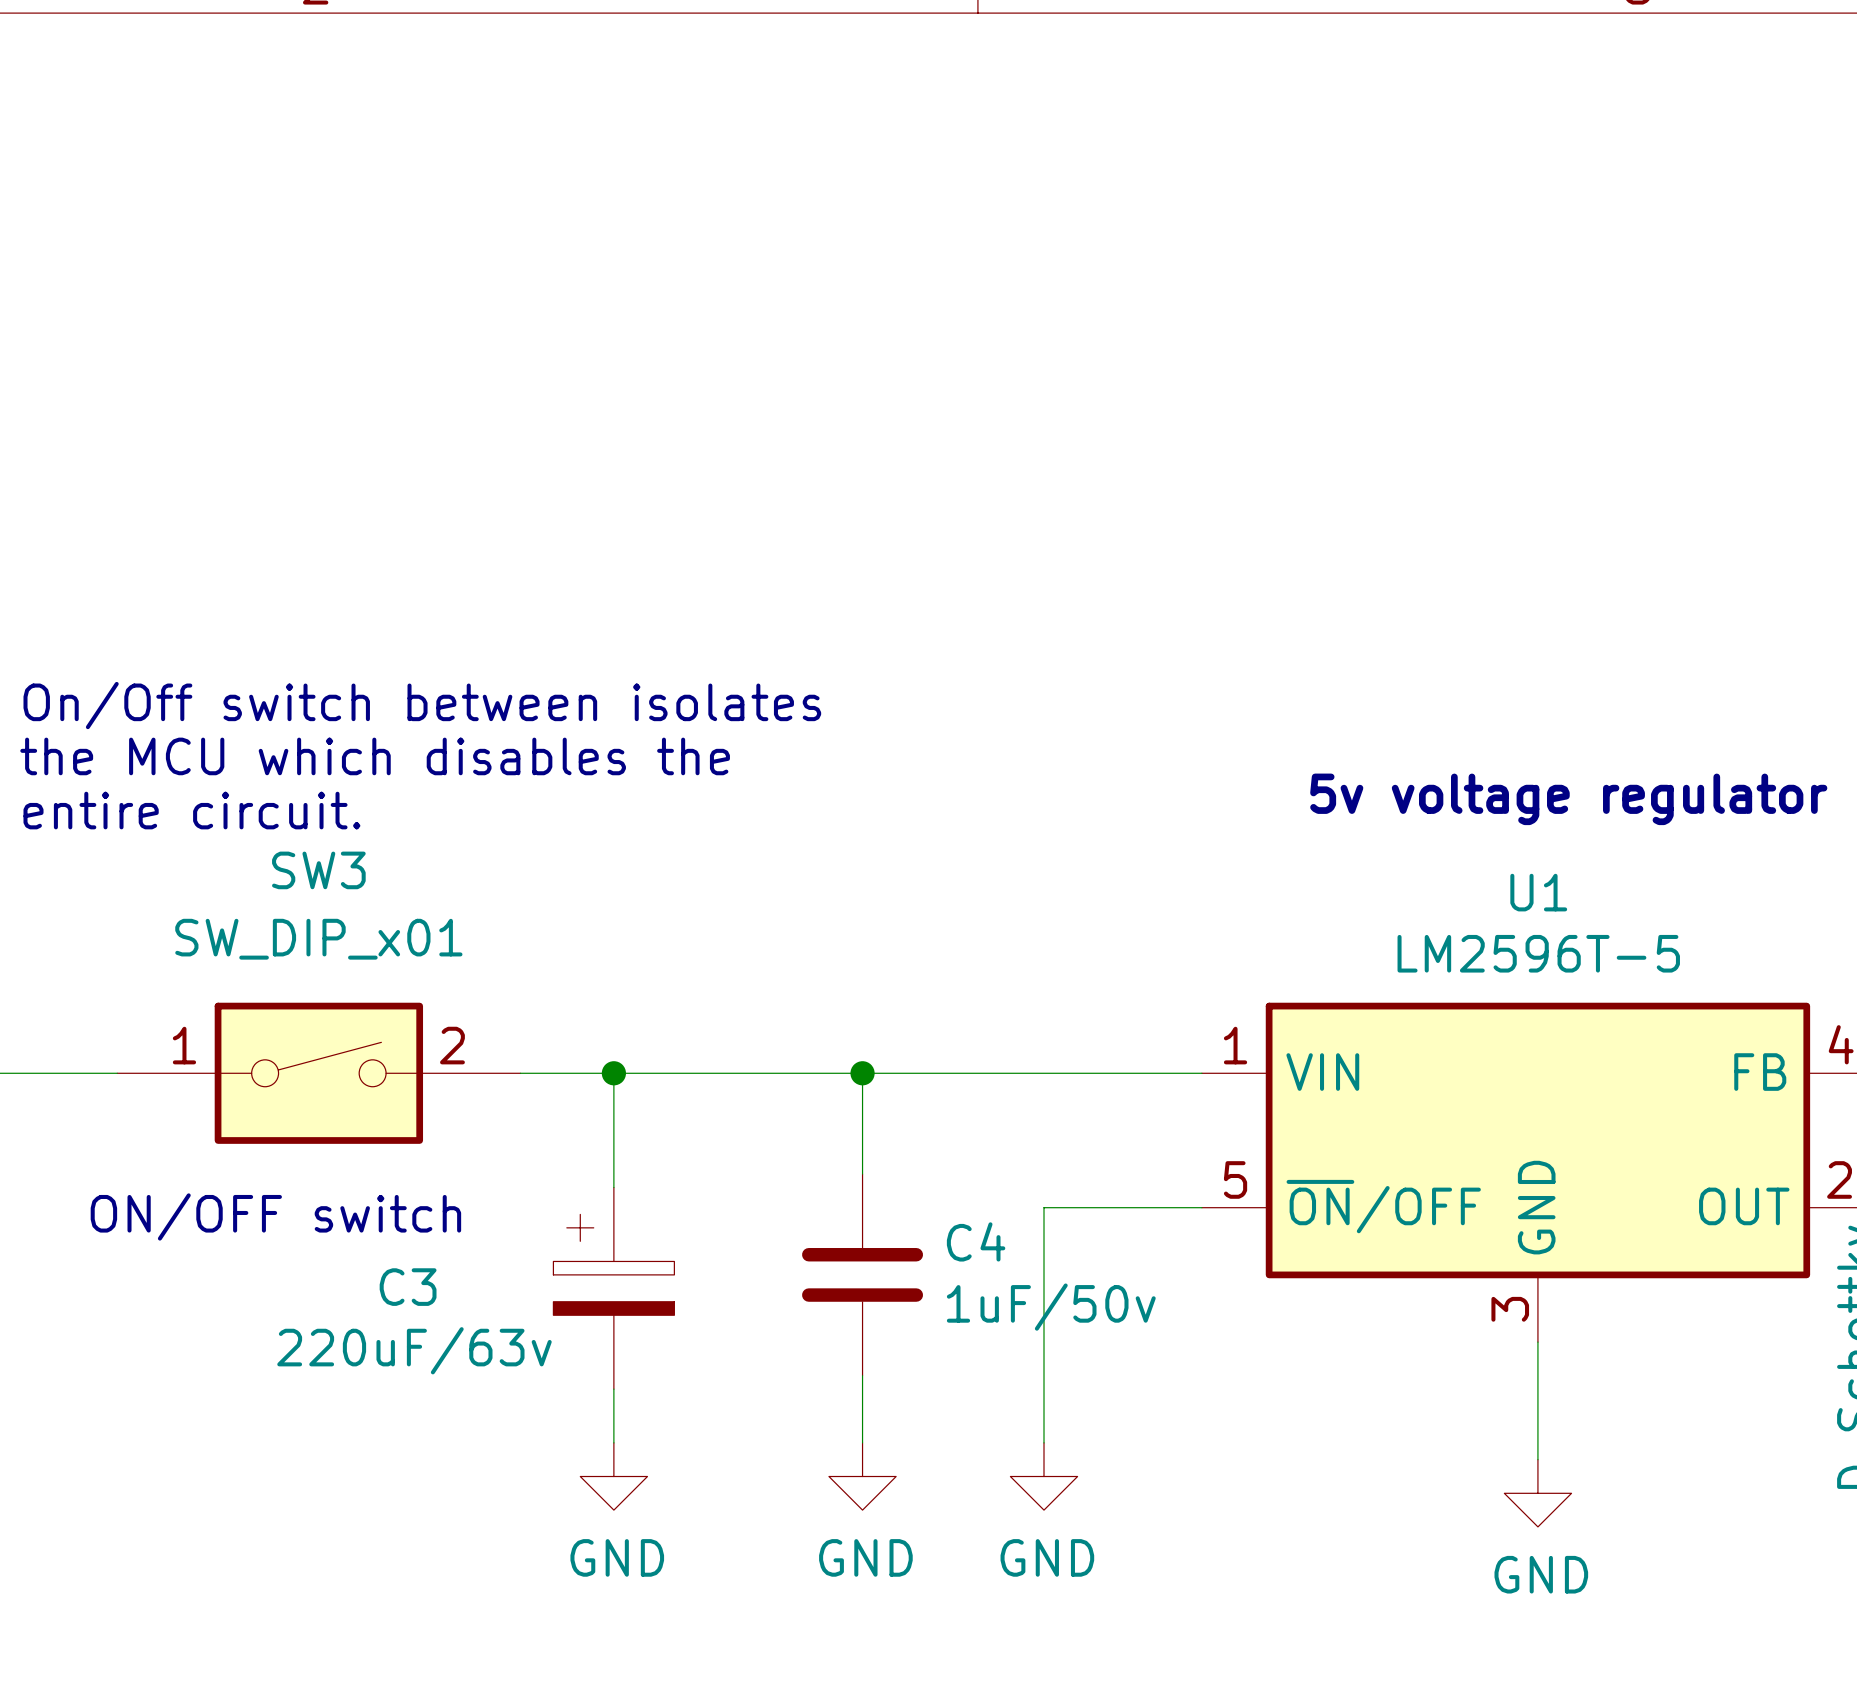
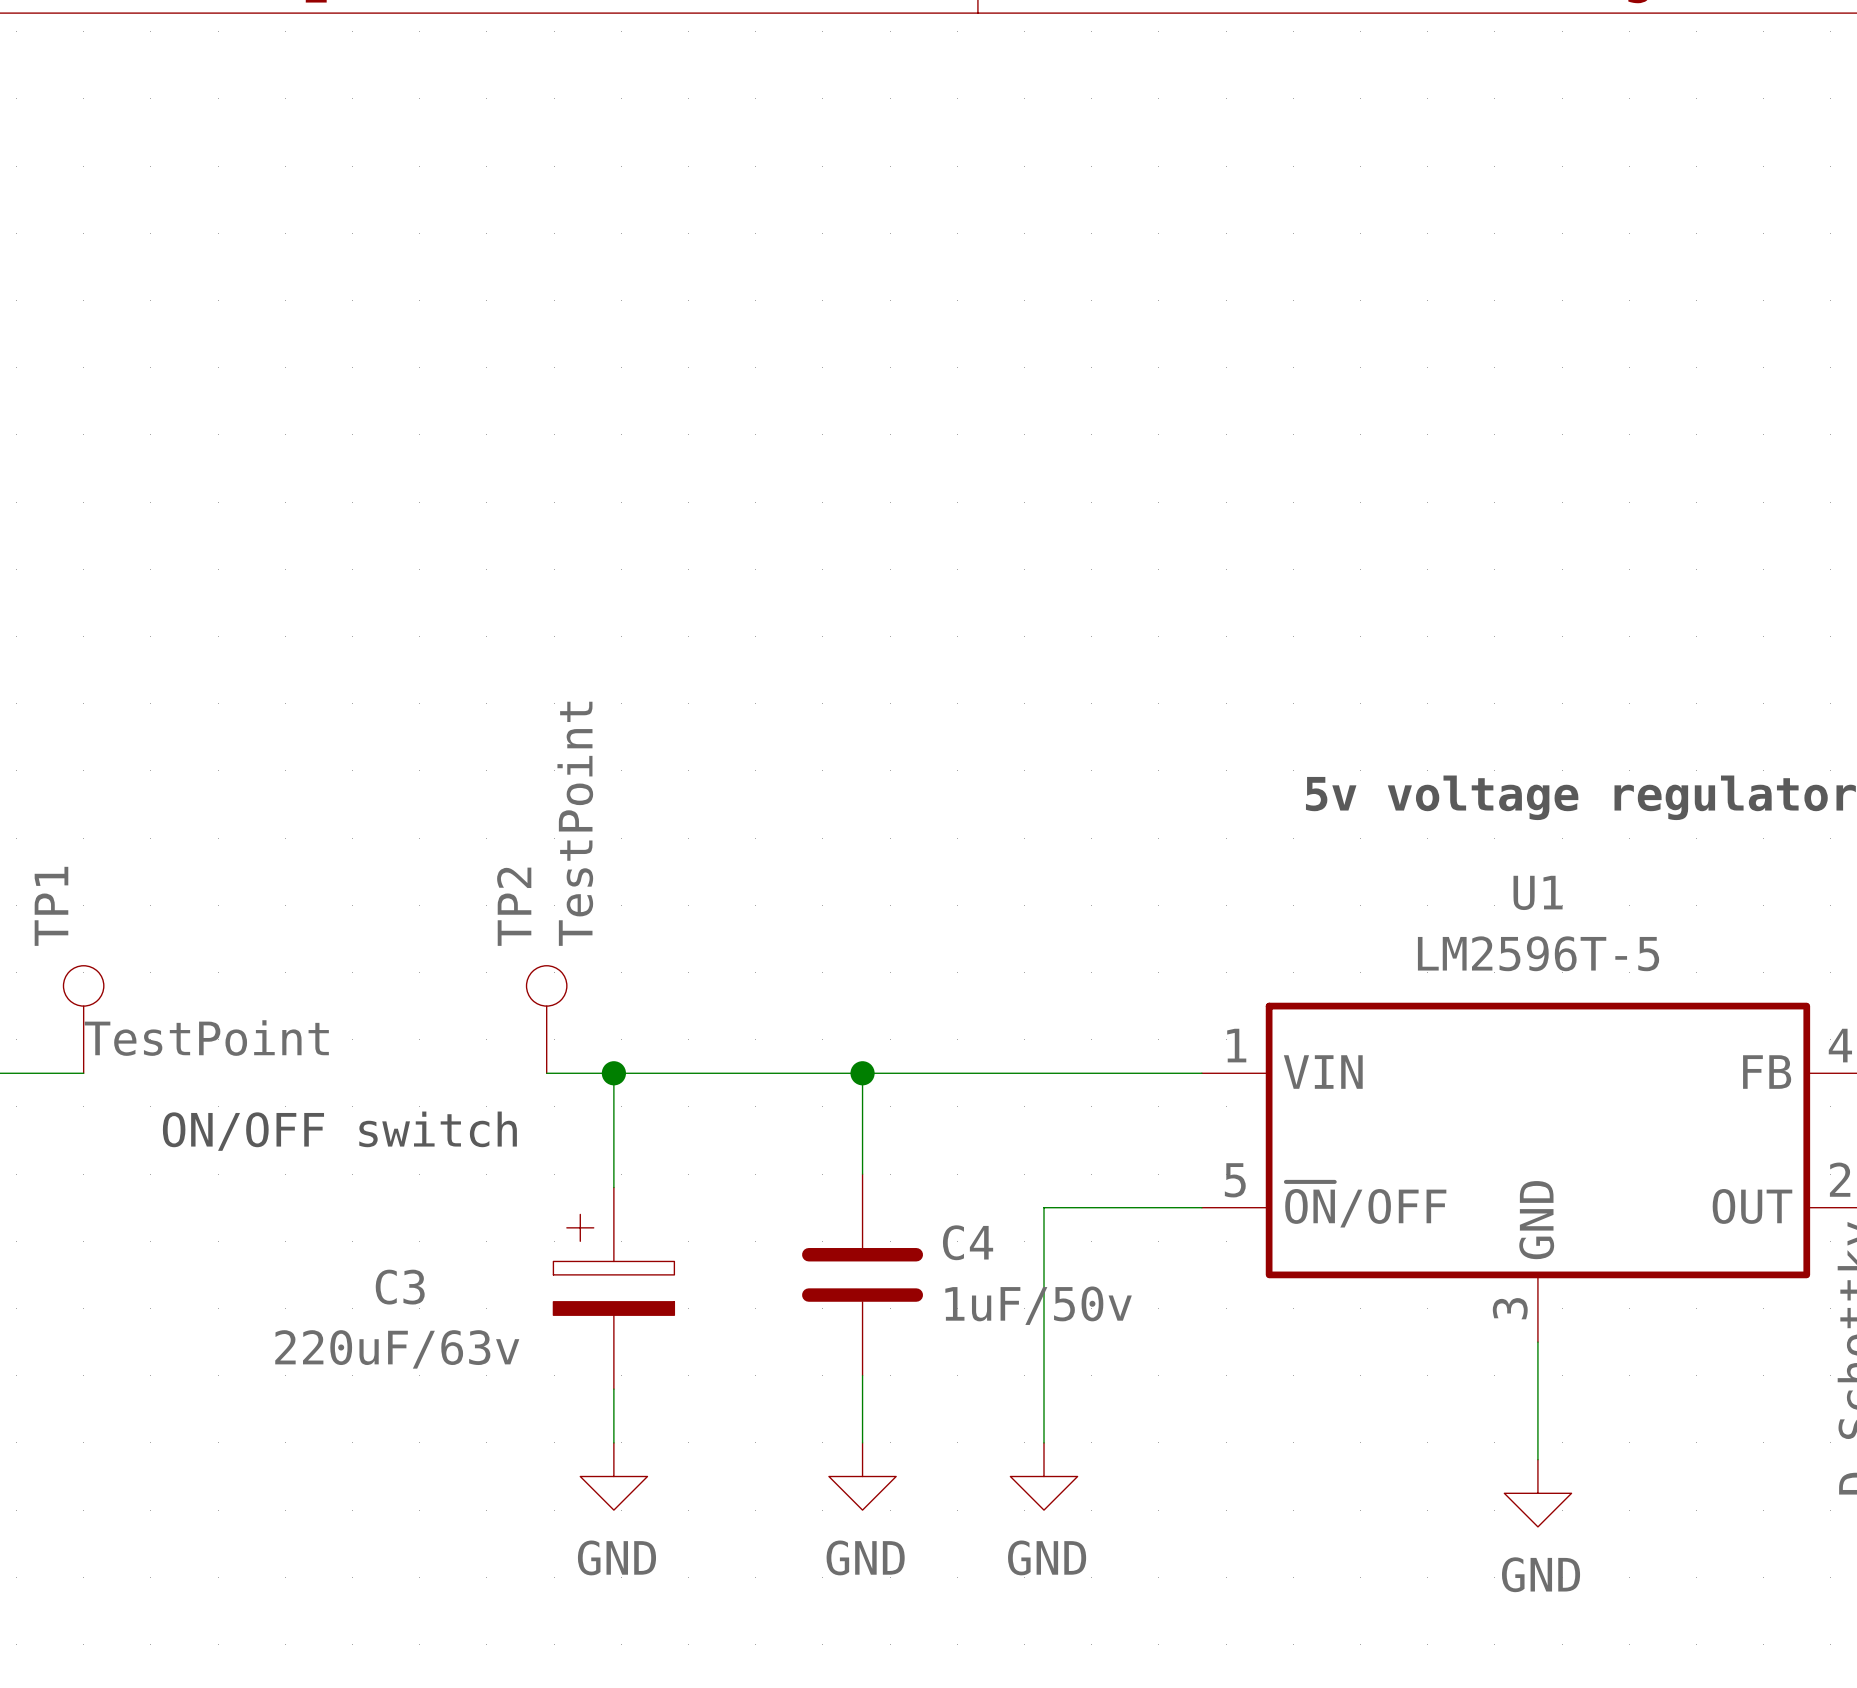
text: On/Off switch between isolates (422, 705) -> none
text: the MCU which disables the (375, 756) -> none
text: entire circuit. (191, 810) -> none
TP1: none -> TestPoint (83, 1019)
TP2: none -> TestPoint (546, 1019)
wire: (83, 1073) (117, 1073) -> none
SW3: SW_DIP_x01 (318, 1073) -> none
wire: (520, 1073) (546, 1073) -> none
text position: ON/OFF switch (275, 1216) -> ON/OFF switch (339, 1131)

